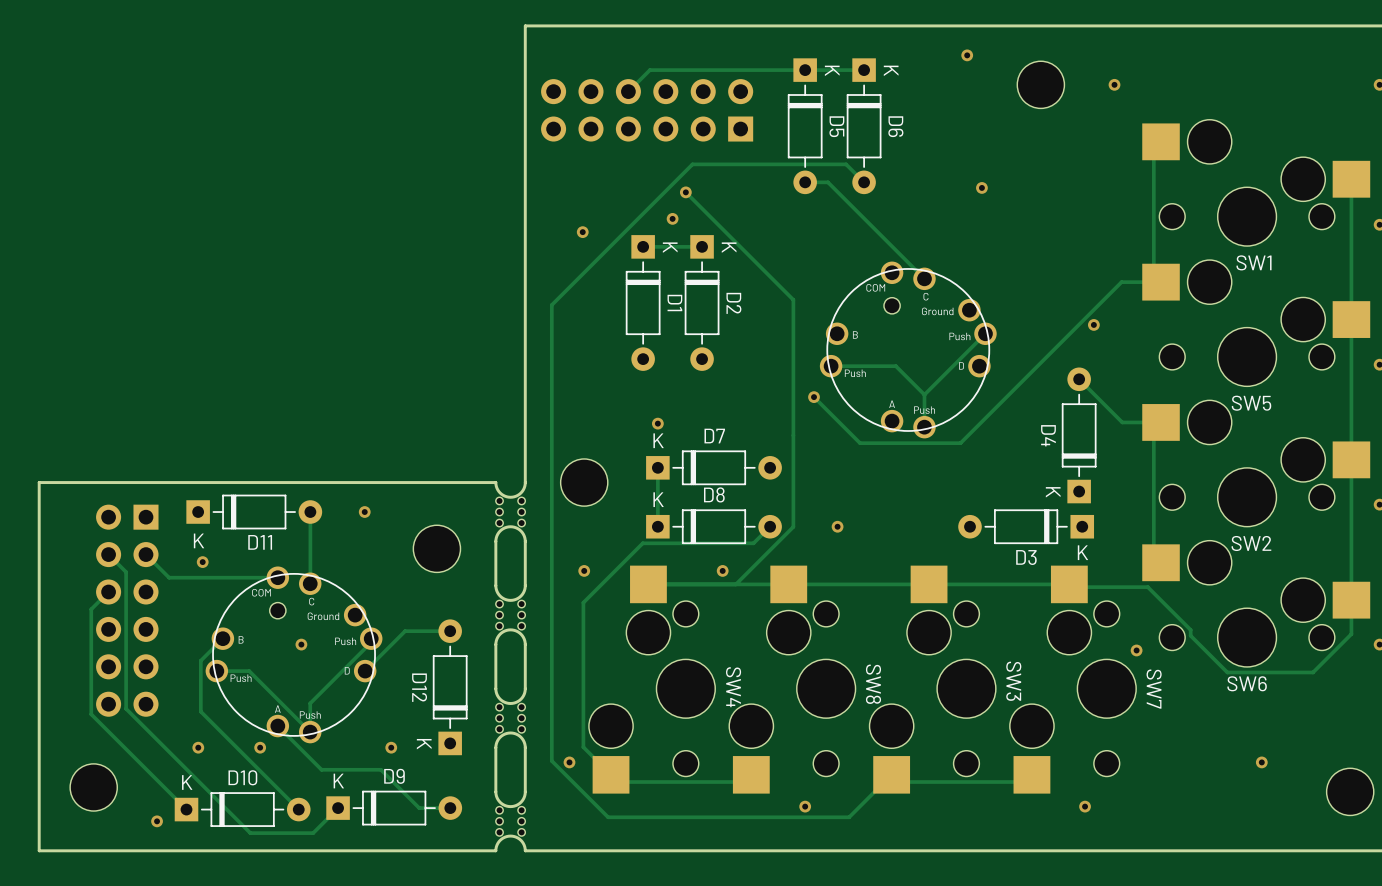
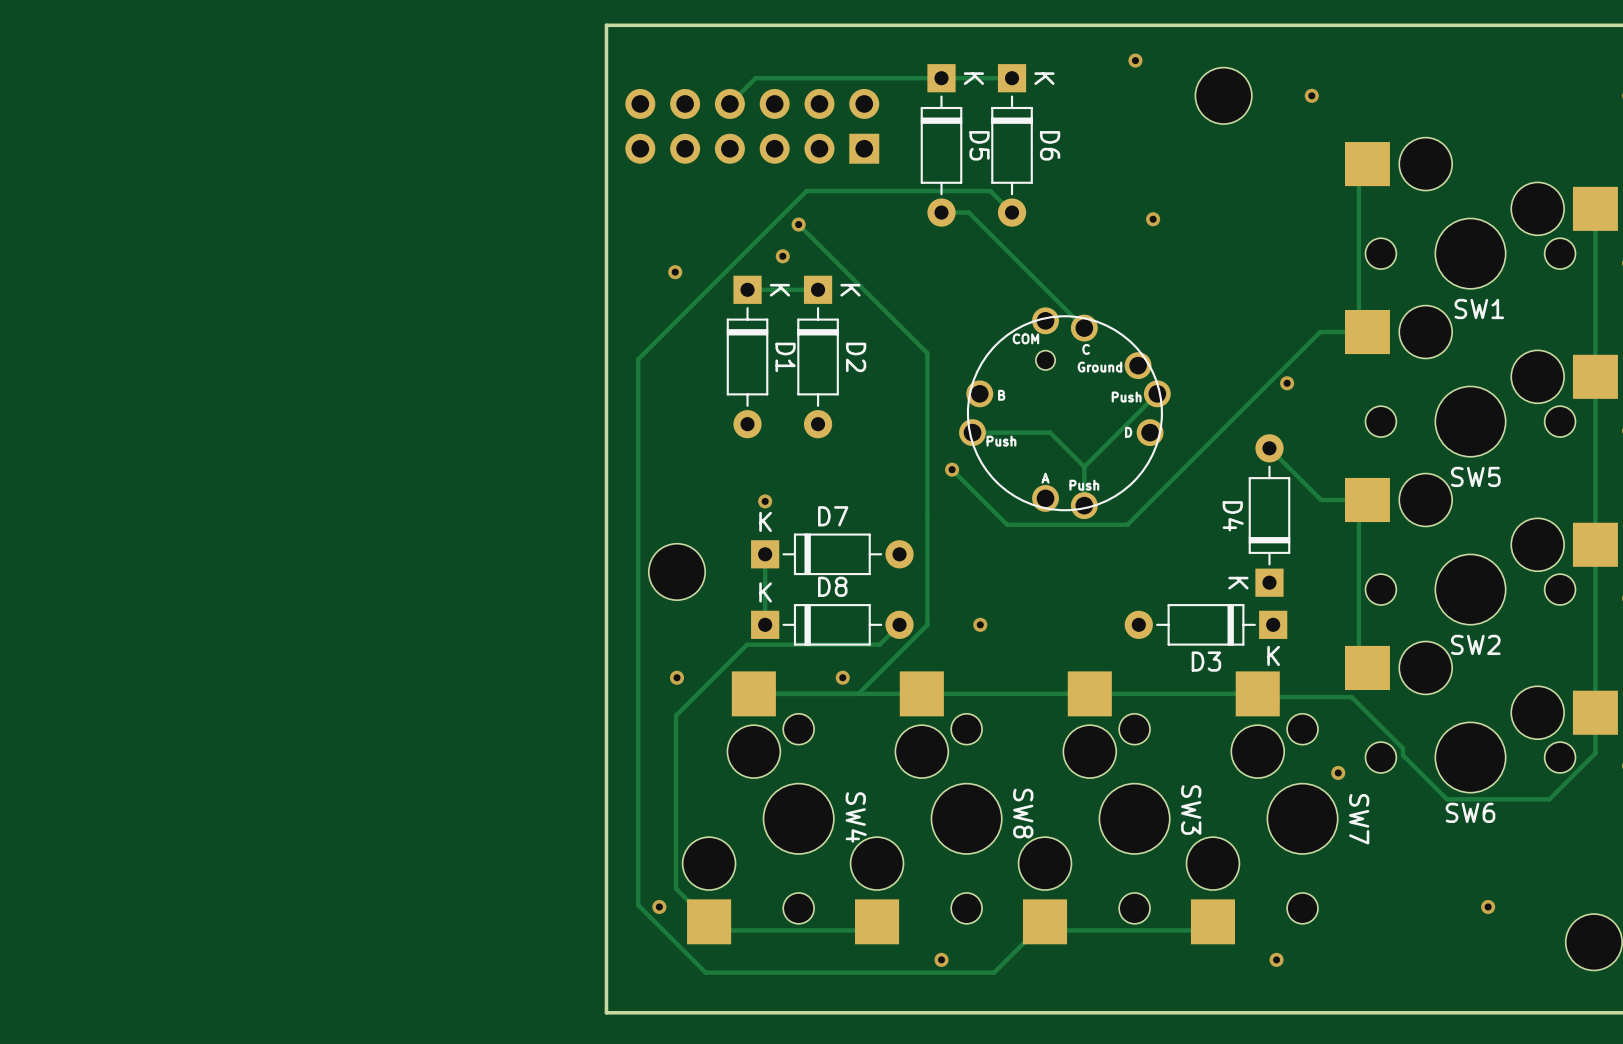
board edge: (525, 482) (520, 492) (510, 497) (500, 492) (495, 482) (39, 482) (39, 850) (495, 850) (500, 840) (510, 836) (520, 840) (525, 850) -> (606, 942) (606, 1012)
D11: (254, 512) -> none
track: (310, 512) (310, 583) -> none
via: (364, 512) -> none
part: (510, 512) -> none
board edge: (525, 541) (520, 531) (510, 526) (500, 531) (495, 541) (495, 585) (497, 593) (504, 599) (514, 599) (522, 594) (525, 585) -> (606, 642) (606, 571)
part: (436, 548) -> none
track: (108, 554) (126, 572) (126, 708) (250, 833) (313, 833) (338, 808) -> none
track: (145, 554) (169, 577) (277, 577) -> none
via: (202, 562) -> none
track: (108, 591) (91, 609) (91, 714) (186, 809) -> none
part: (127, 610) -> none
part: (510, 615) -> none
track: (450, 631) (405, 631) (365, 671) -> none
track: (222, 638) (200, 660) (200, 711) (298, 809) -> none
track: (371, 638) (371, 642) (310, 703) (310, 732) (249, 671) (216, 671) -> none
via: (301, 644) -> none
board edge: (525, 644) (520, 634) (510, 629) (500, 634) (495, 644) (495, 688) (497, 696) (504, 702) (514, 703) (522, 697) (525, 688) -> (606, 765) (606, 695)
part: (294, 654) -> none
D12: (450, 687) -> none
part: (510, 718) -> none
track: (277, 726) (321, 769) (380, 769) (419, 808) (450, 808) -> none
via: (198, 747) -> none
via: (260, 747) -> none
via: (391, 747) -> none
board edge: (525, 747) (520, 737) (510, 732) (500, 737) (495, 747) (495, 791) (497, 799) (504, 805) (514, 806) (522, 800) (525, 791) -> (606, 889) (606, 818)
part: (93, 787) -> none
D9: (394, 808) -> none
D10: (242, 809) -> none
via: (157, 821) -> none
part: (510, 821) -> none

